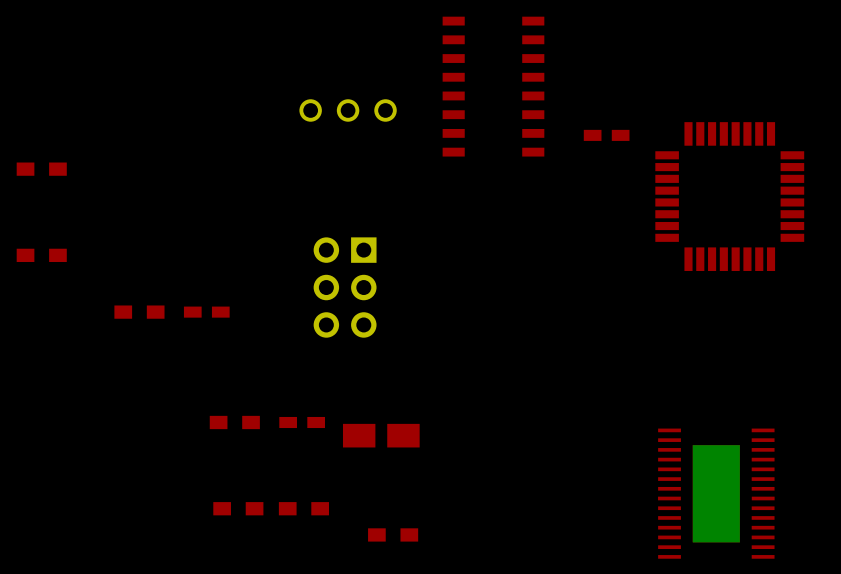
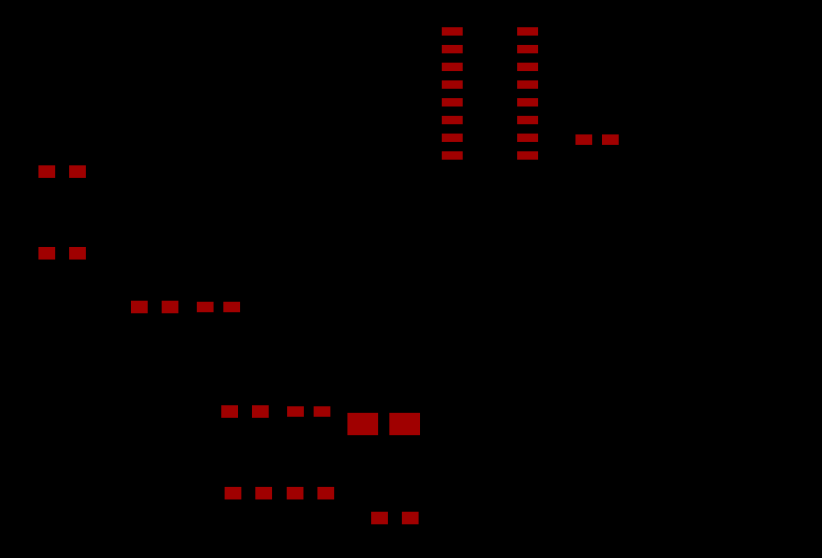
part: (348, 110) -> none
part: (729, 196) -> none
part: (345, 287) -> none
part: (716, 493) -> none

